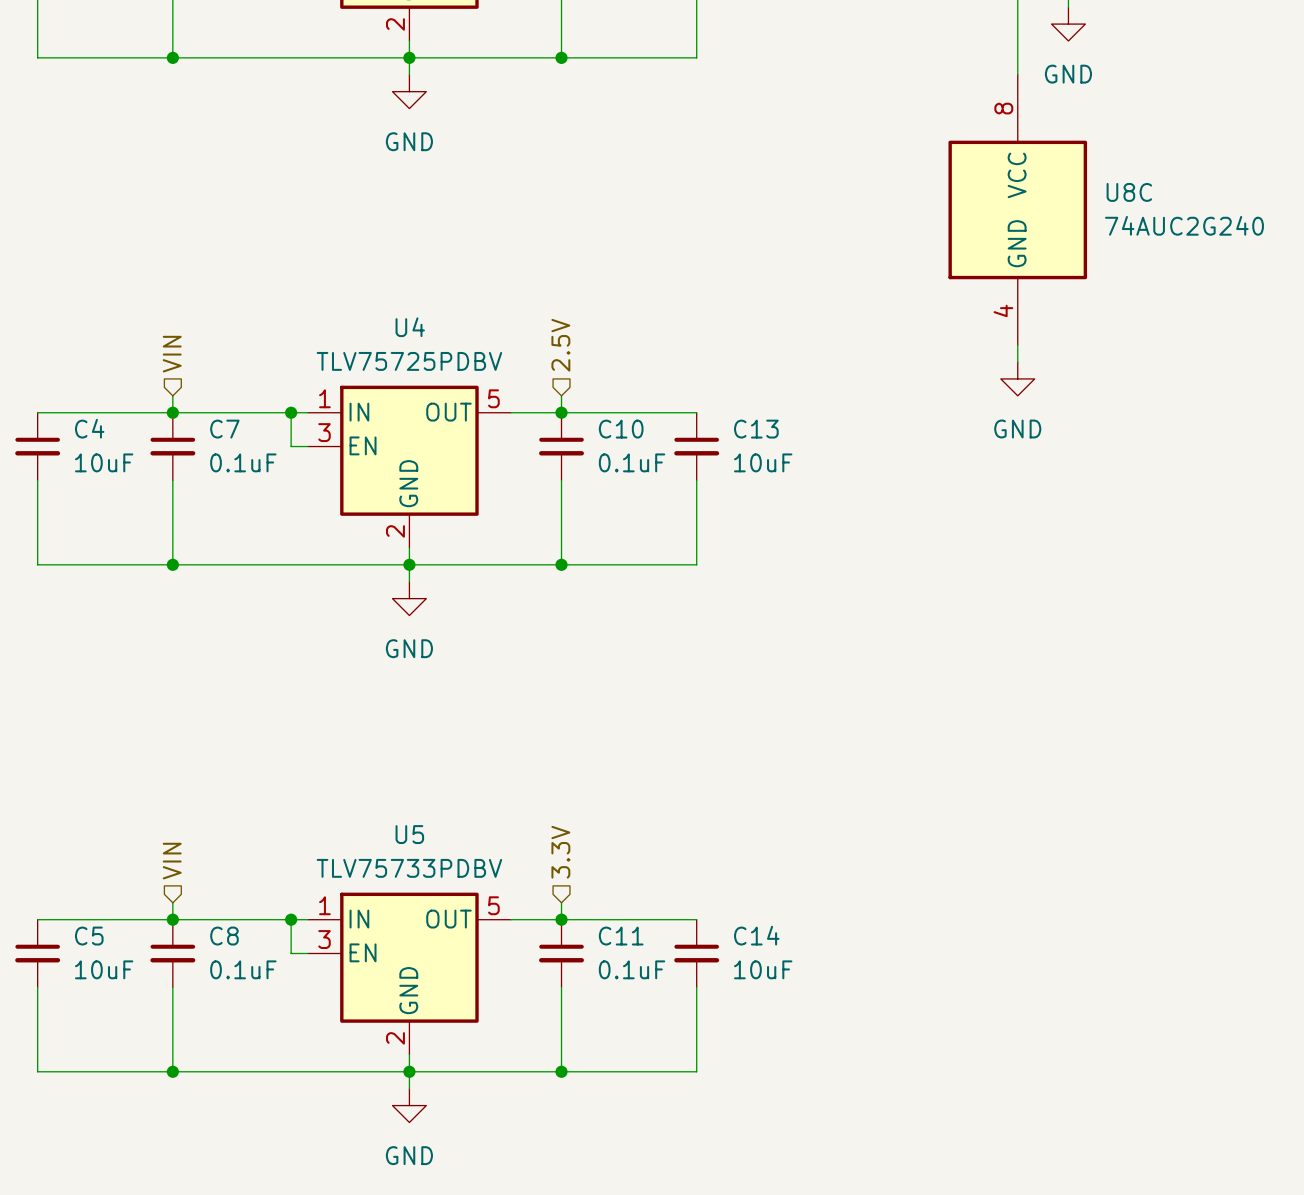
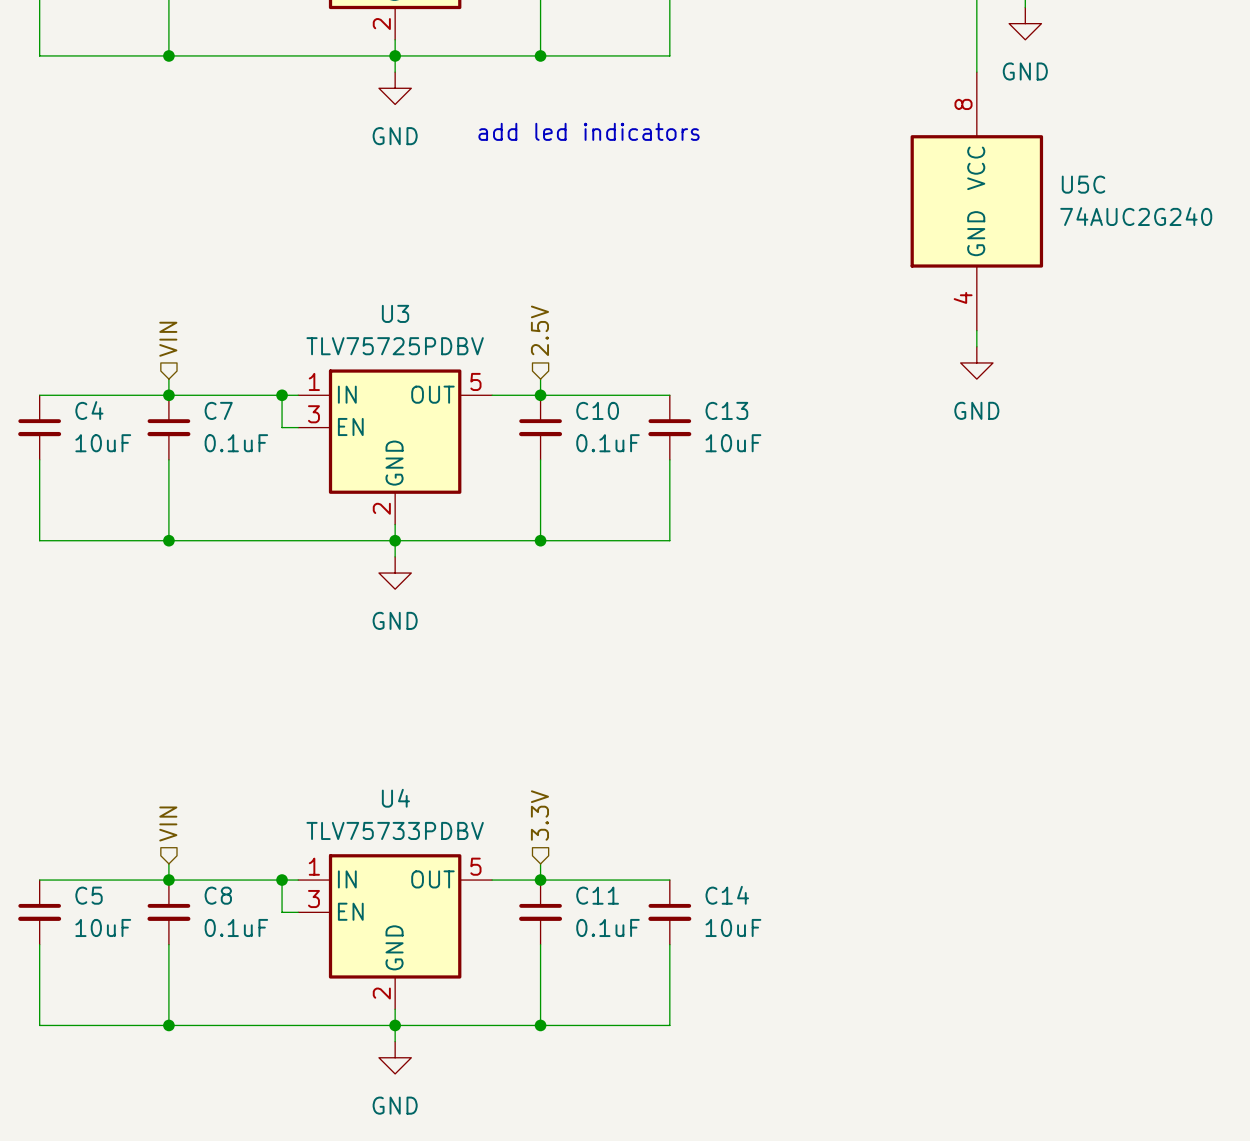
text: none -> add led indicators (589, 131)
U8C name: U8C (1129, 192) -> U5C (1083, 184)
U4 name: U4 (410, 327) -> U3 (395, 313)
U5 name: U5 (409, 834) -> U4 (395, 798)

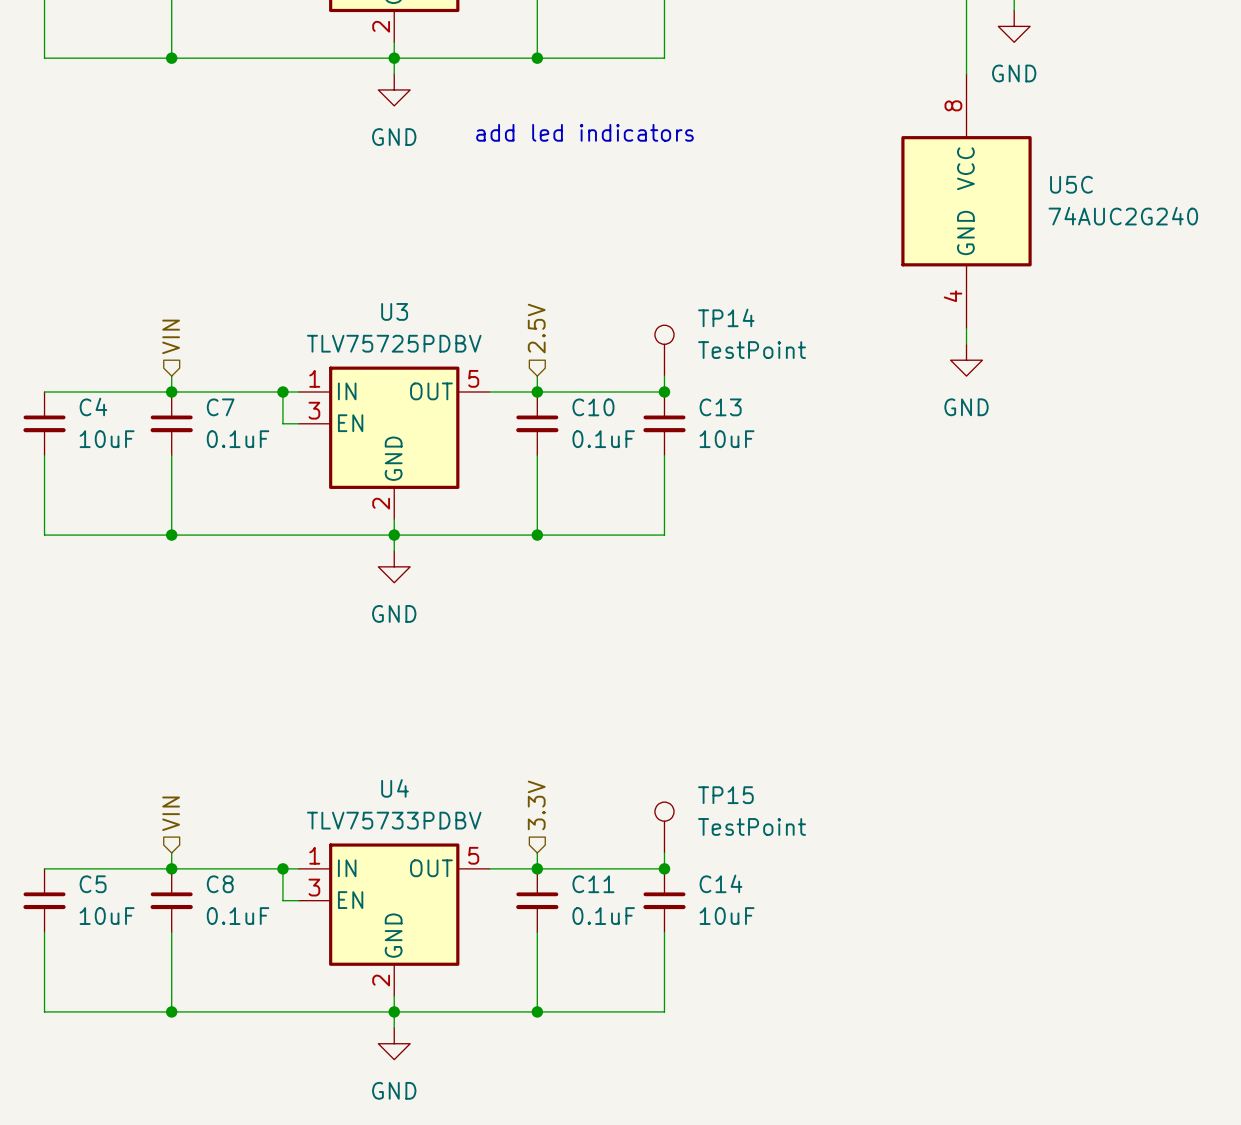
TP14: none -> TestPoint (664, 350)
wire: none -> (664, 376) (664, 391)
junction: none -> (664, 391)
TP15: none -> TestPoint (664, 827)
wire: none -> (664, 852) (664, 868)
junction: none -> (664, 868)

